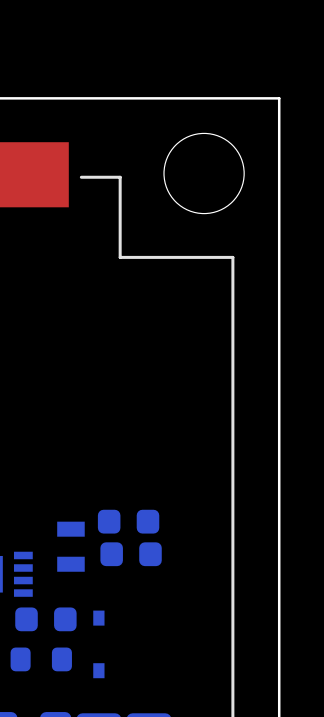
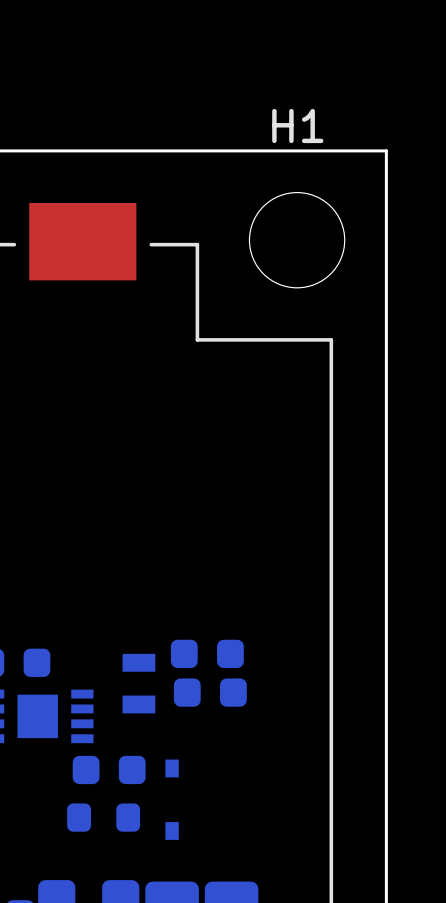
H1 name: none -> H1 (297, 125)

